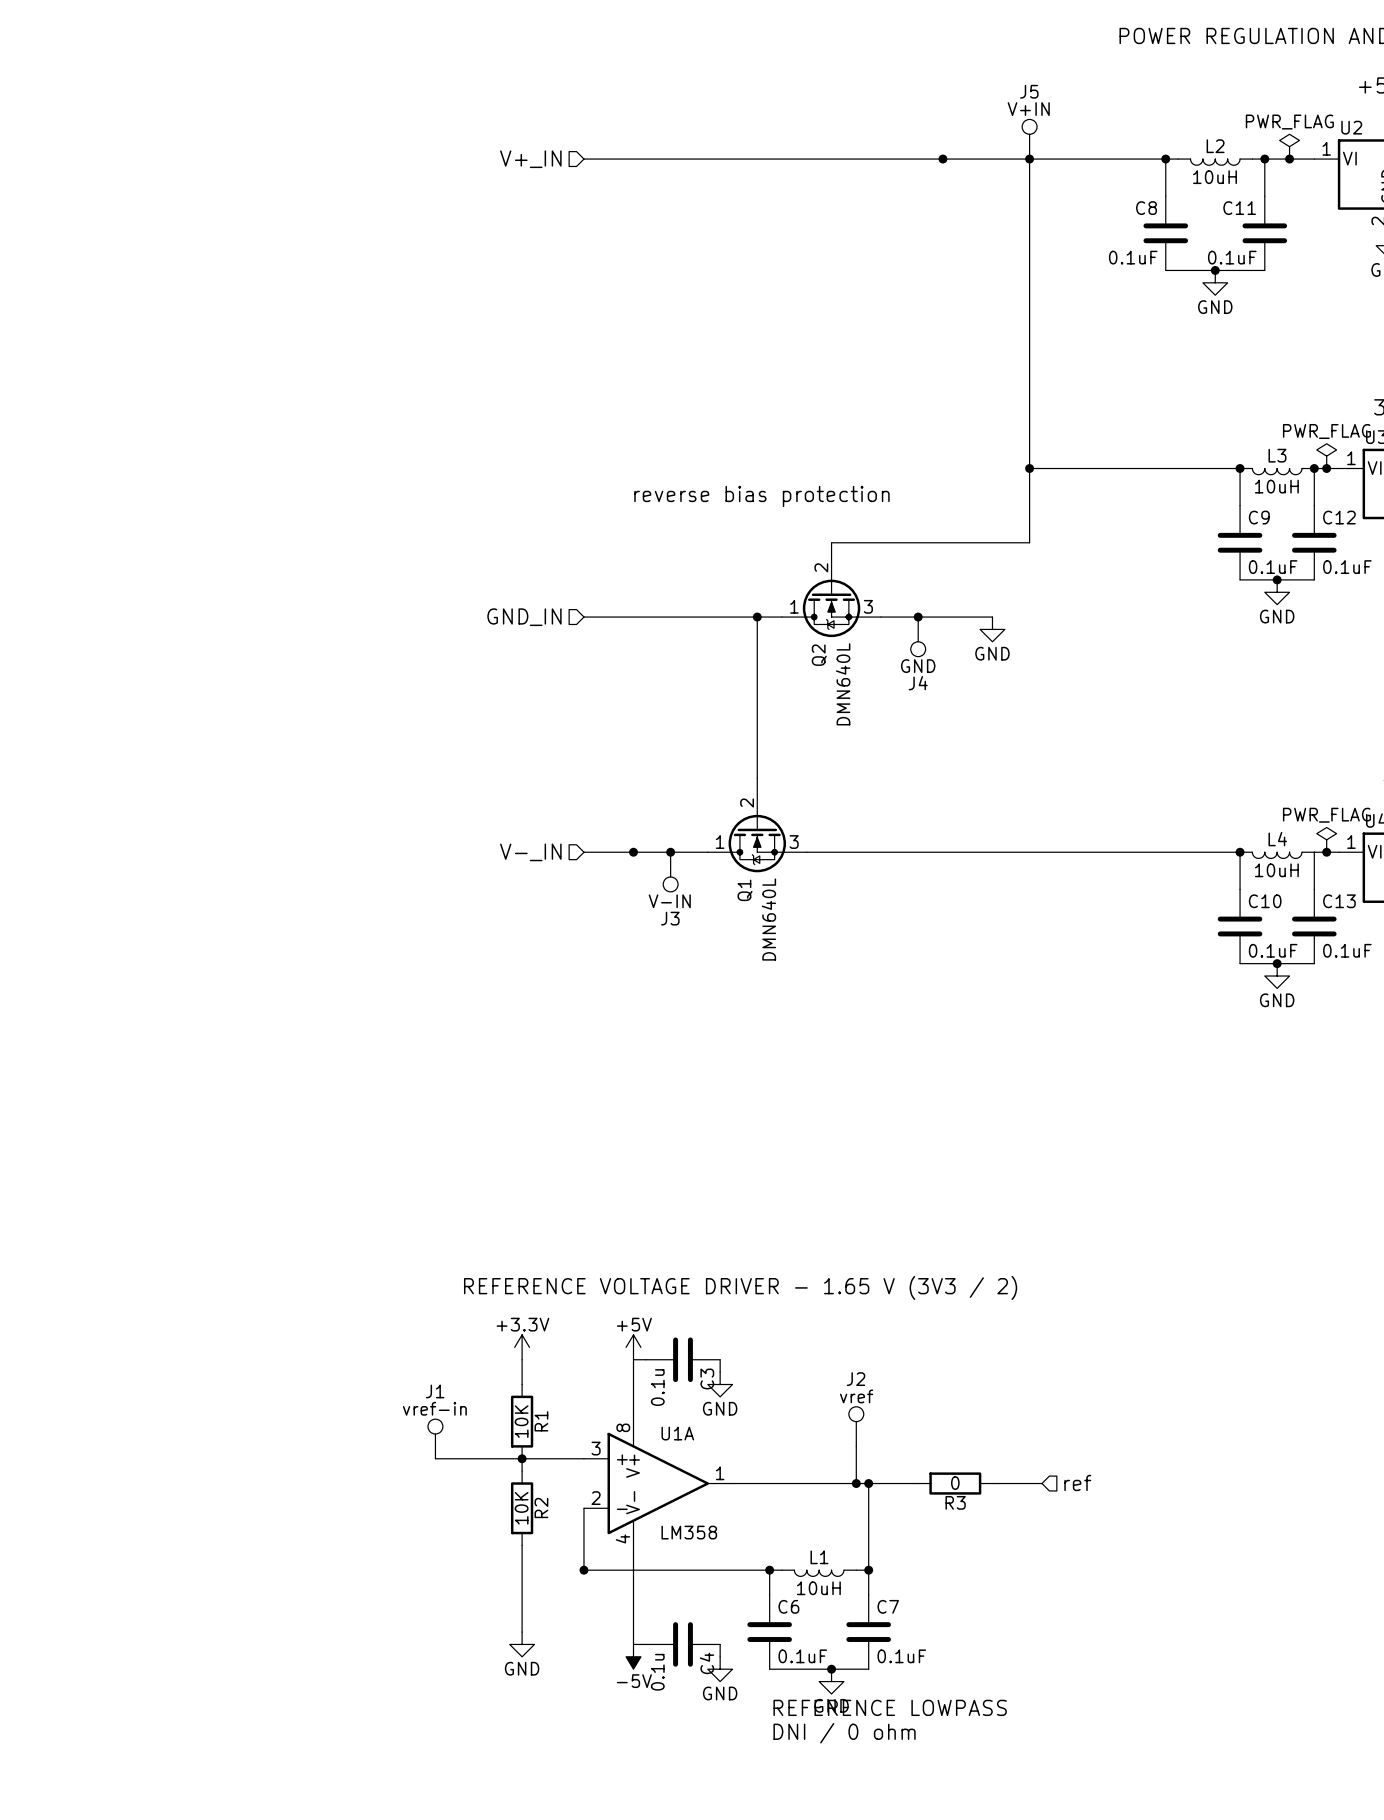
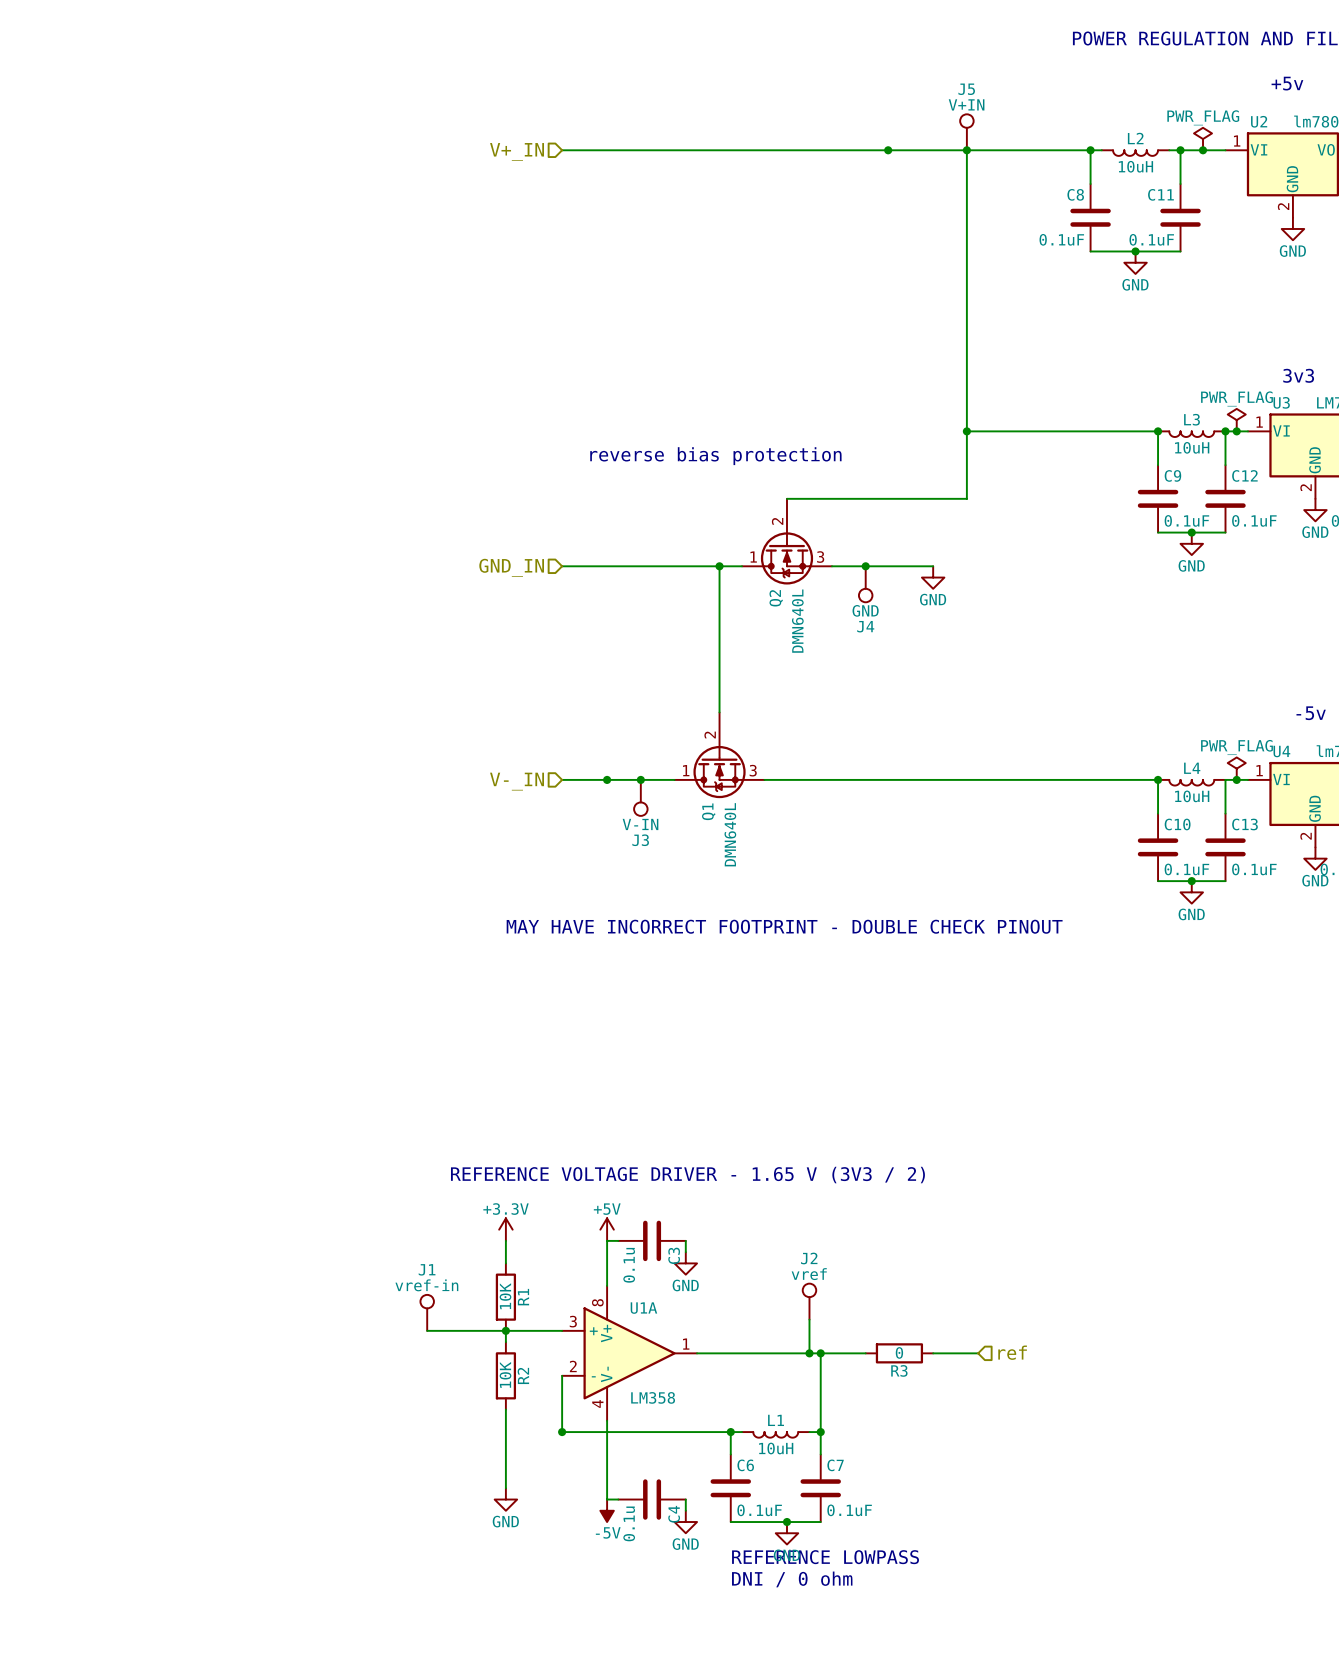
text: none -> MAY HAVE INCORRECT FOOTPRINT - DOUBLE CHECK PINOUT (784, 926)

